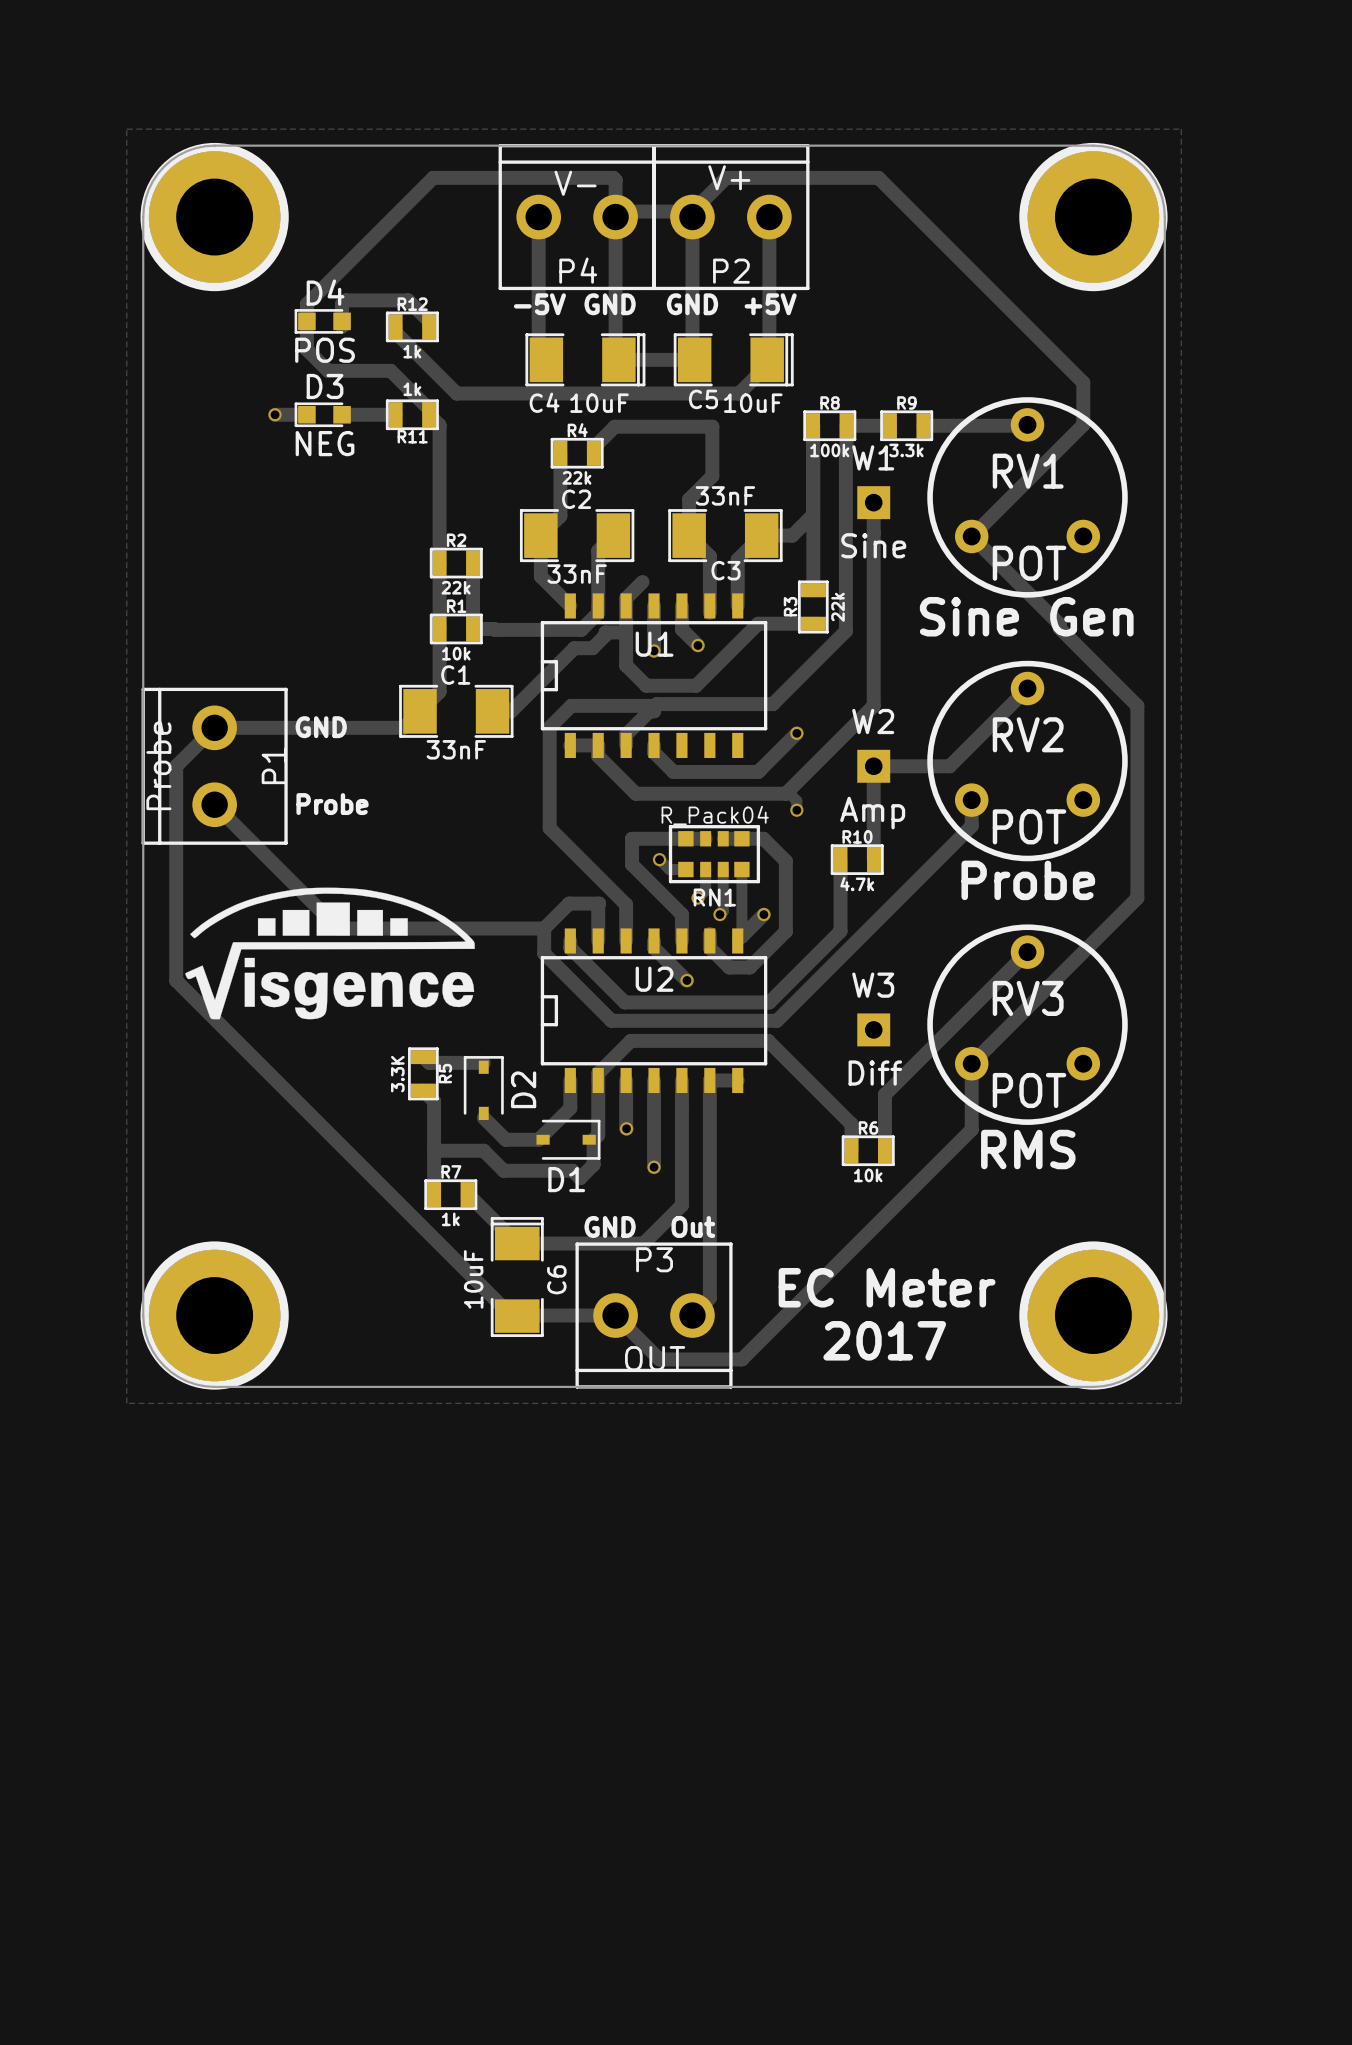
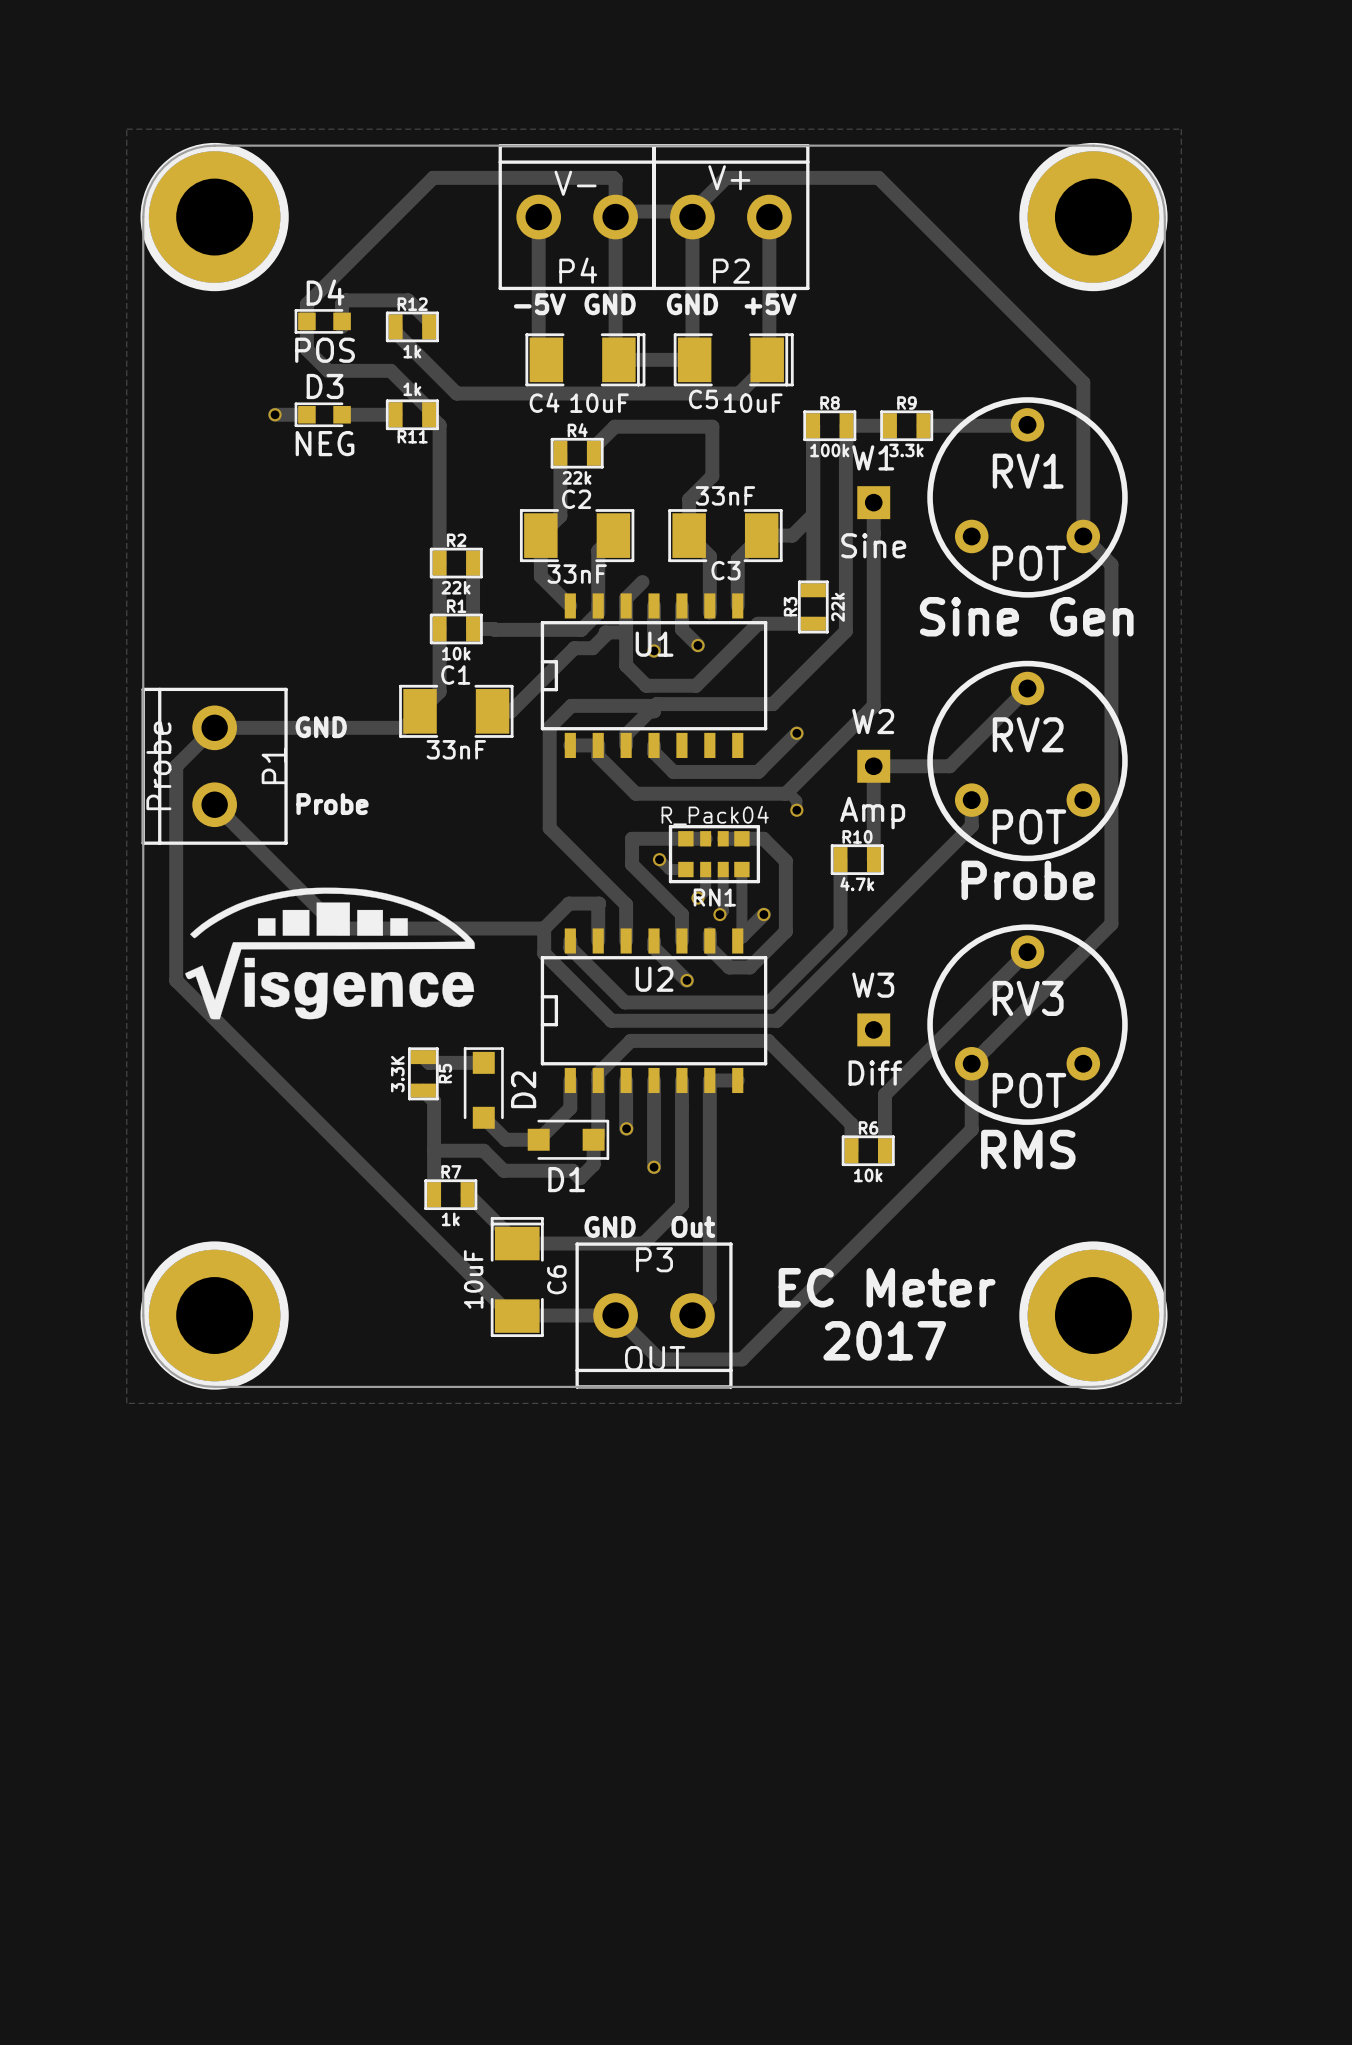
track: (1083, 424) (971, 536) (1137, 705) (1137, 898) (1111, 924) -> (1083, 424) (1083, 536) (1111, 564) (1111, 924)
D2 footprint: [463, 1056, 504, 1120] -> [463, 1047, 504, 1129]
D1 footprint: [536, 1119, 601, 1160] -> [527, 1119, 610, 1160]

